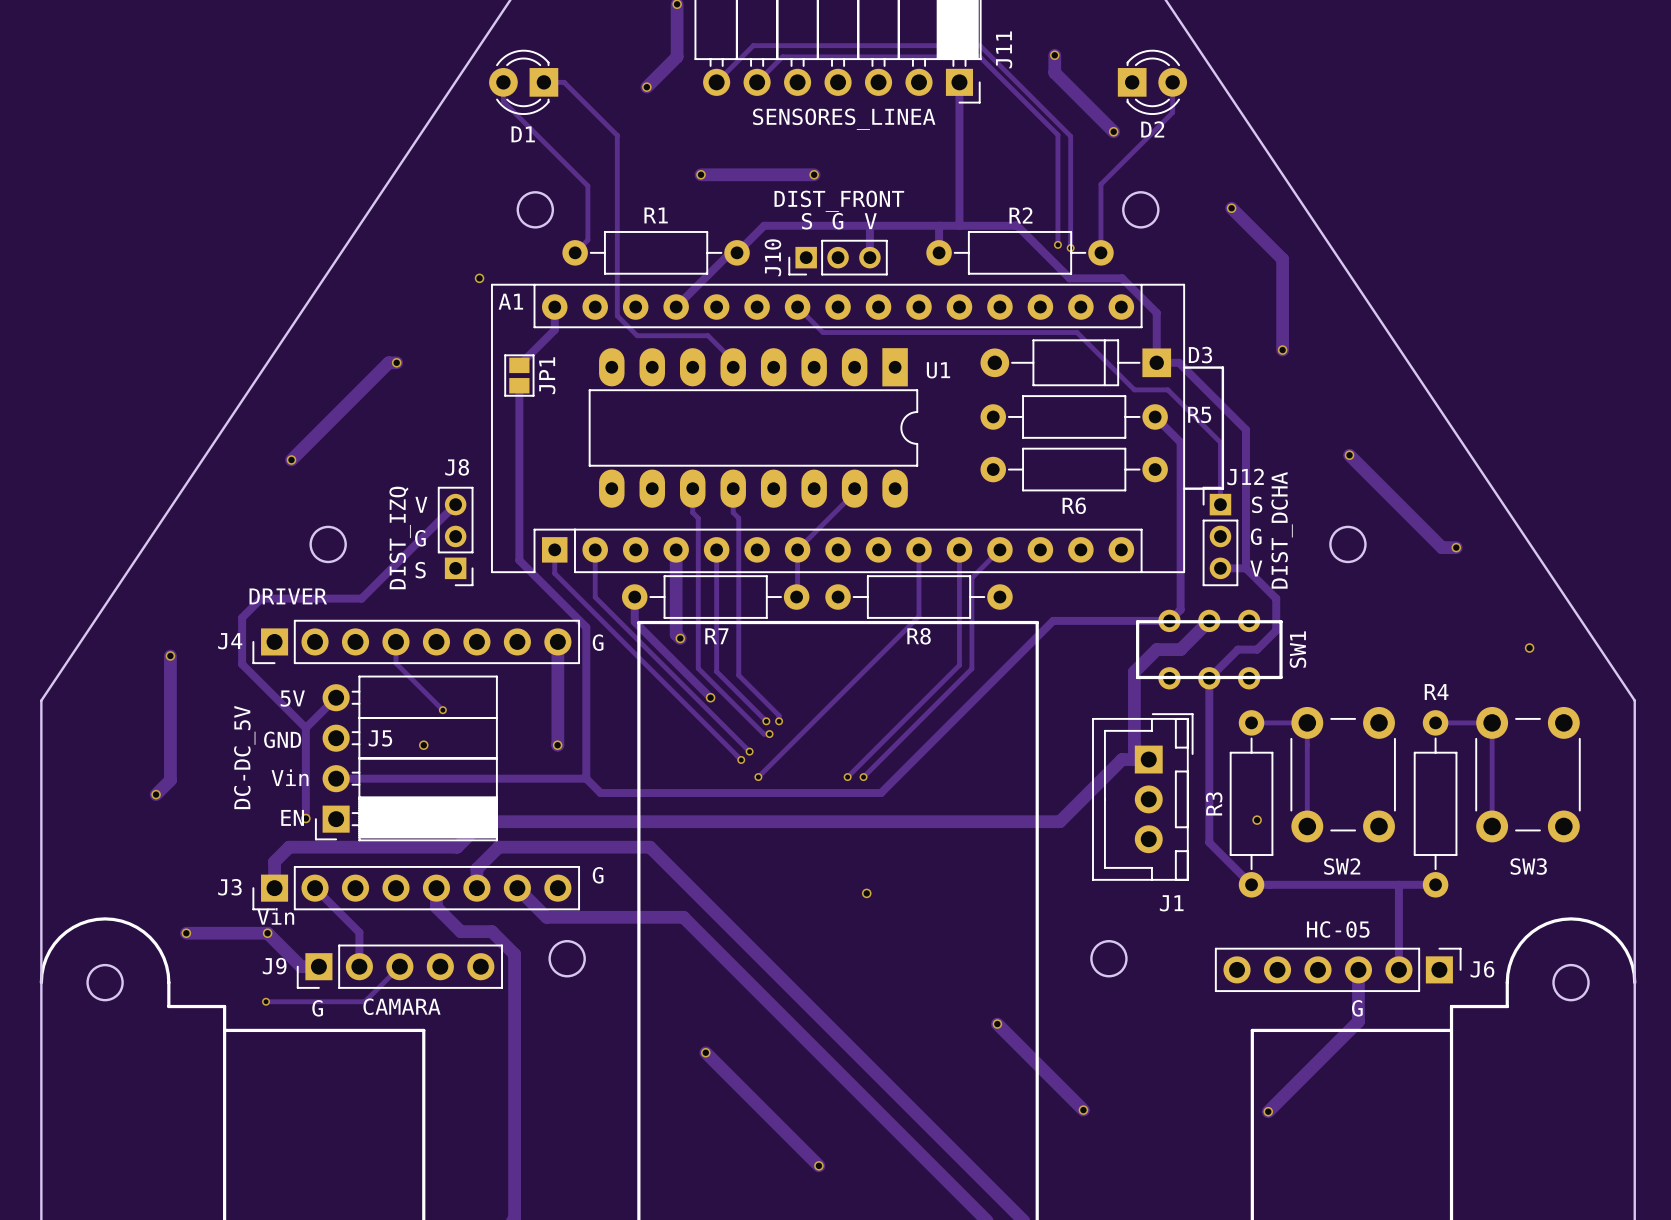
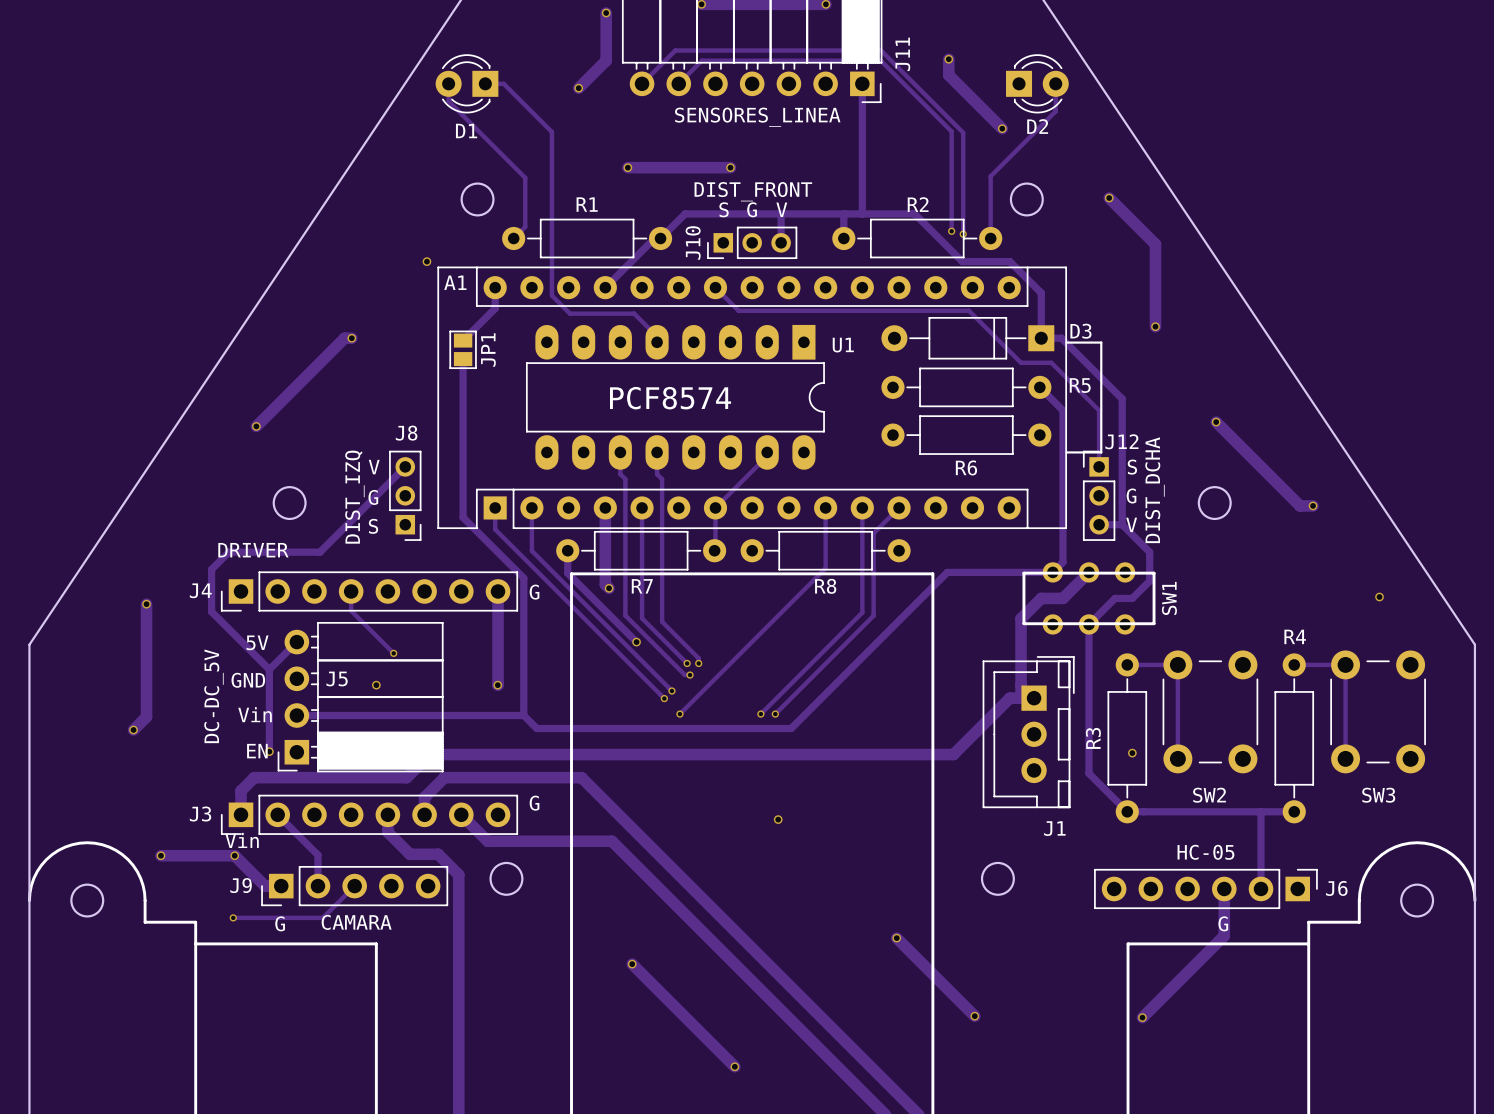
text: none -> PCF8574 (670, 398)

